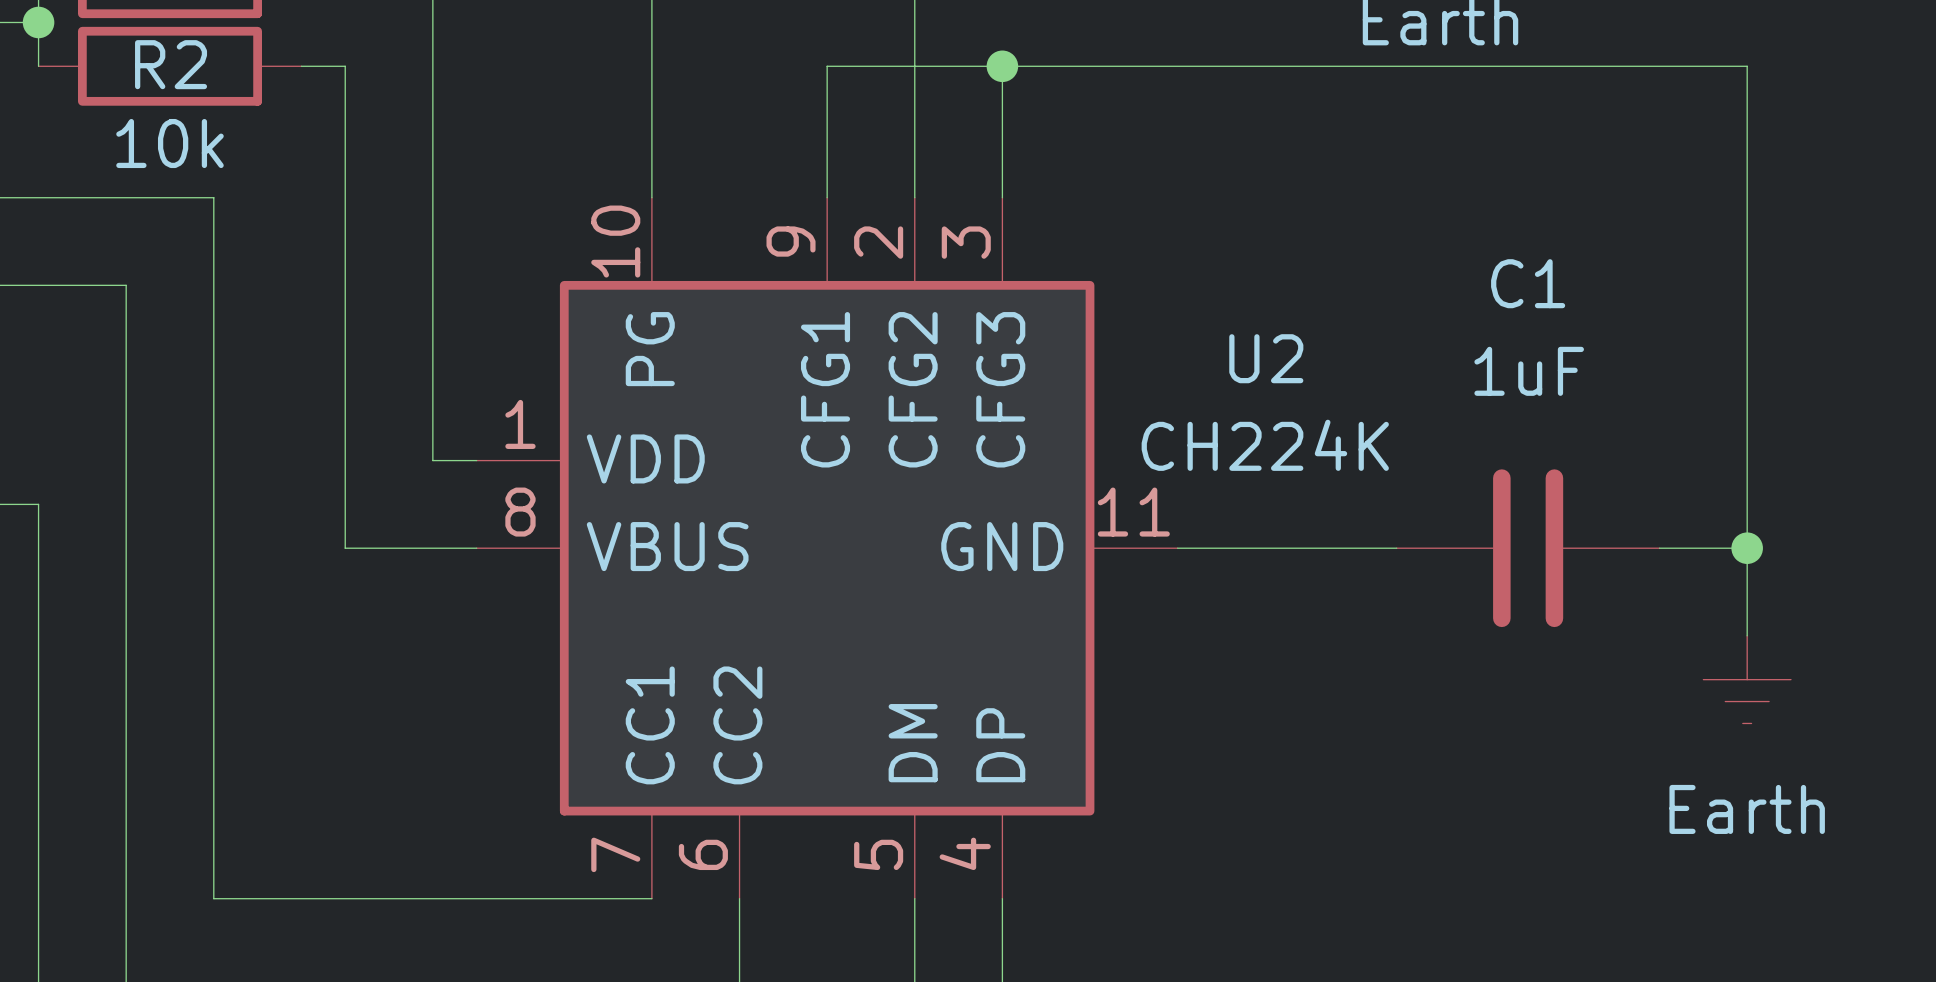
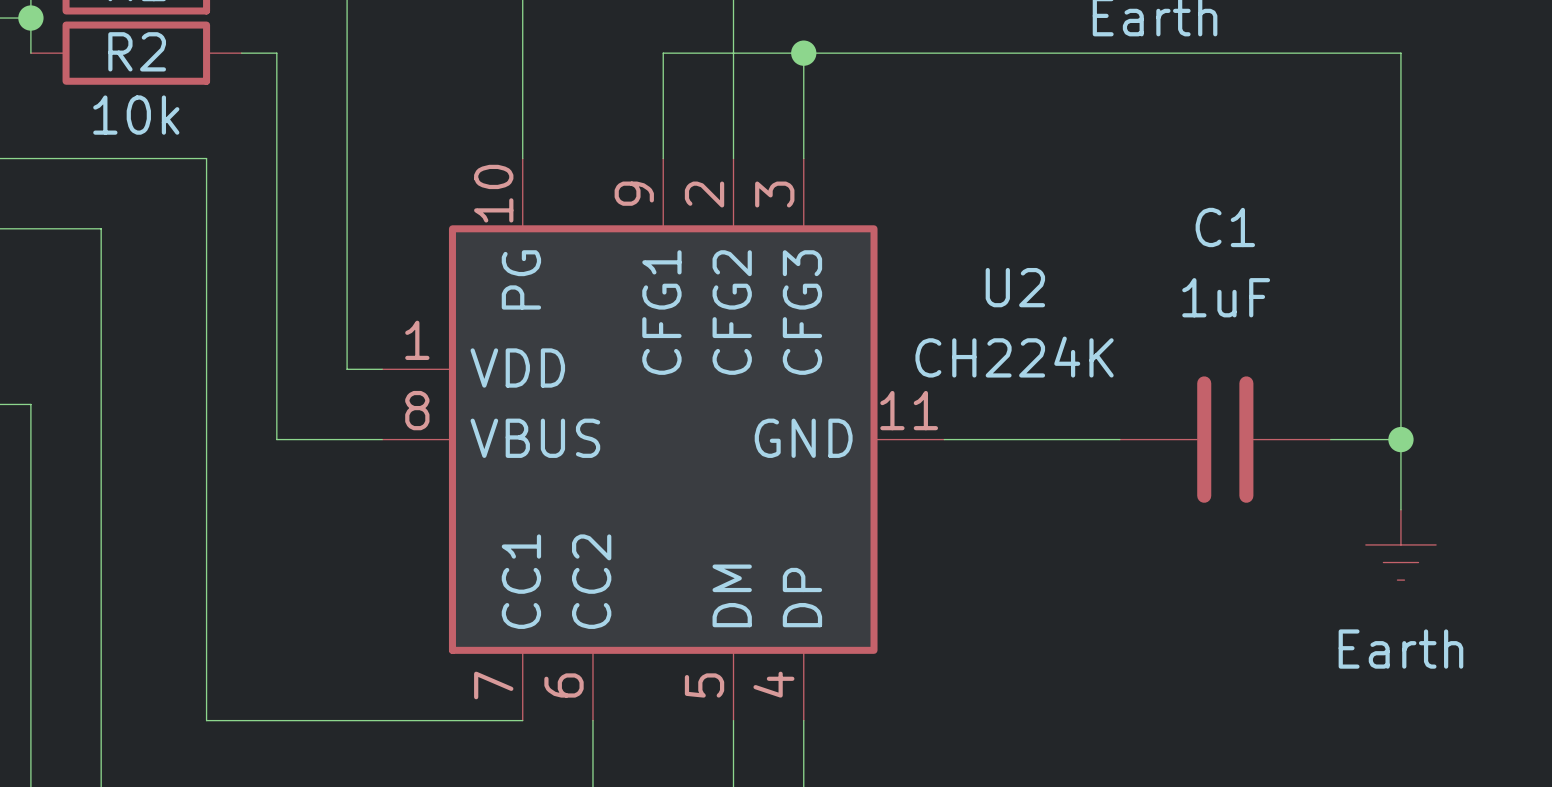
wire: (213, 197) (213, 898) (257, 898) -> (171, 158) (206, 158) (206, 720)

